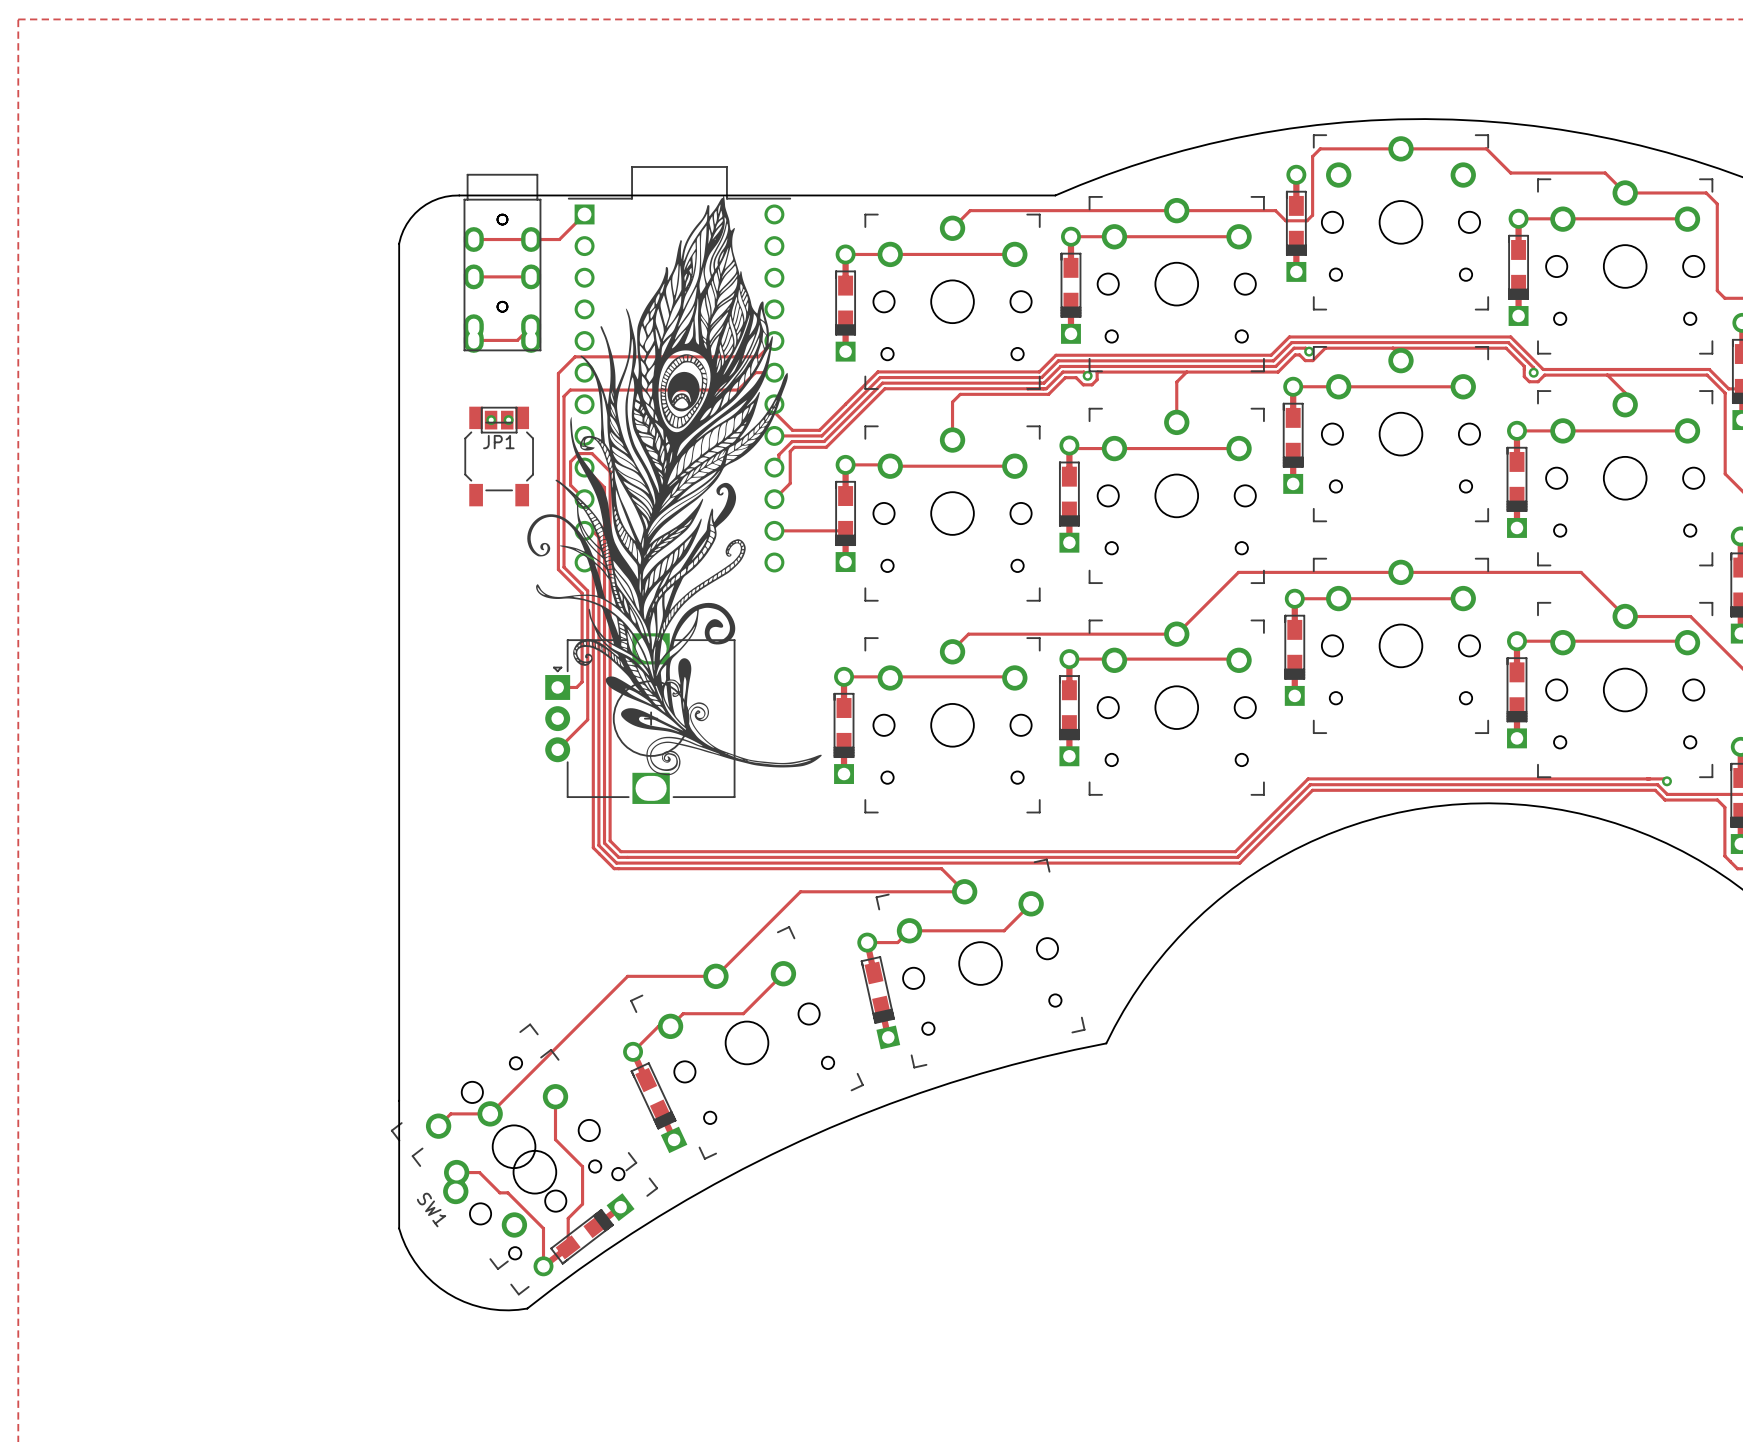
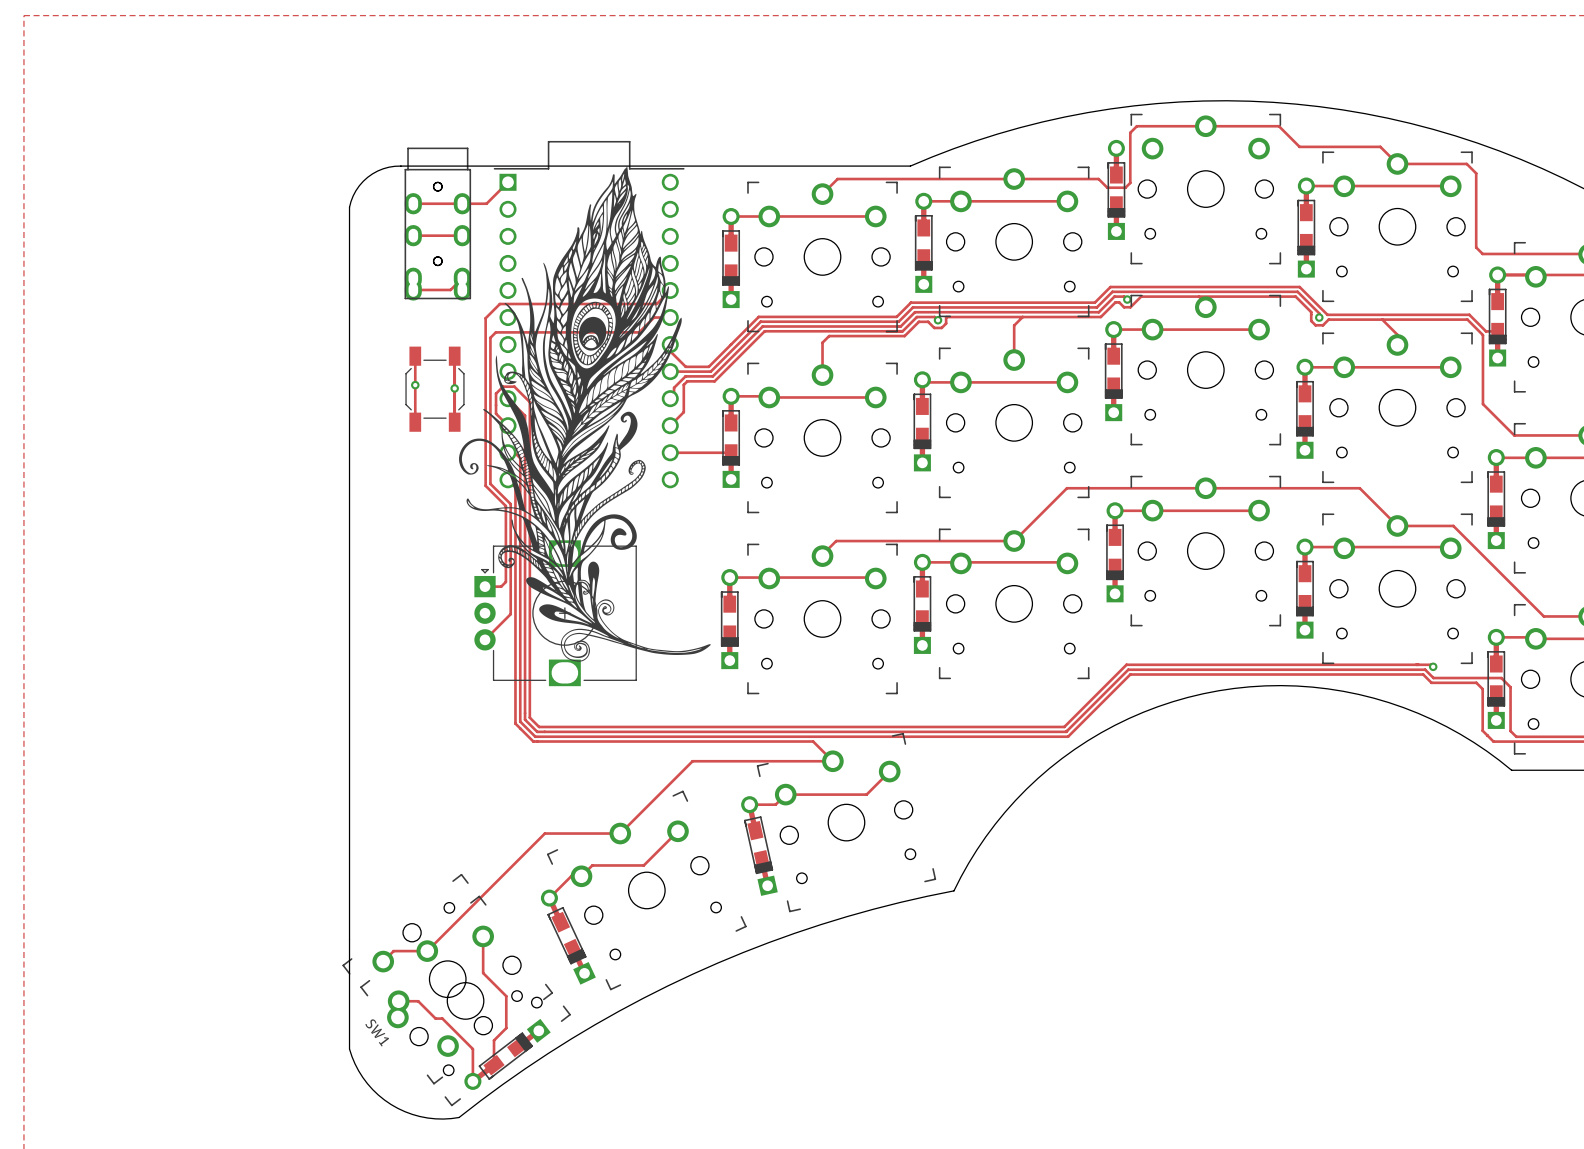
track: none -> (415, 356) (415, 422)
track: none -> (454, 356) (454, 422)
via: (491, 420) -> none
JP1: (499, 420) -> none
via: (508, 420) -> none
via: none -> (415, 385)
via: none -> (454, 388)

